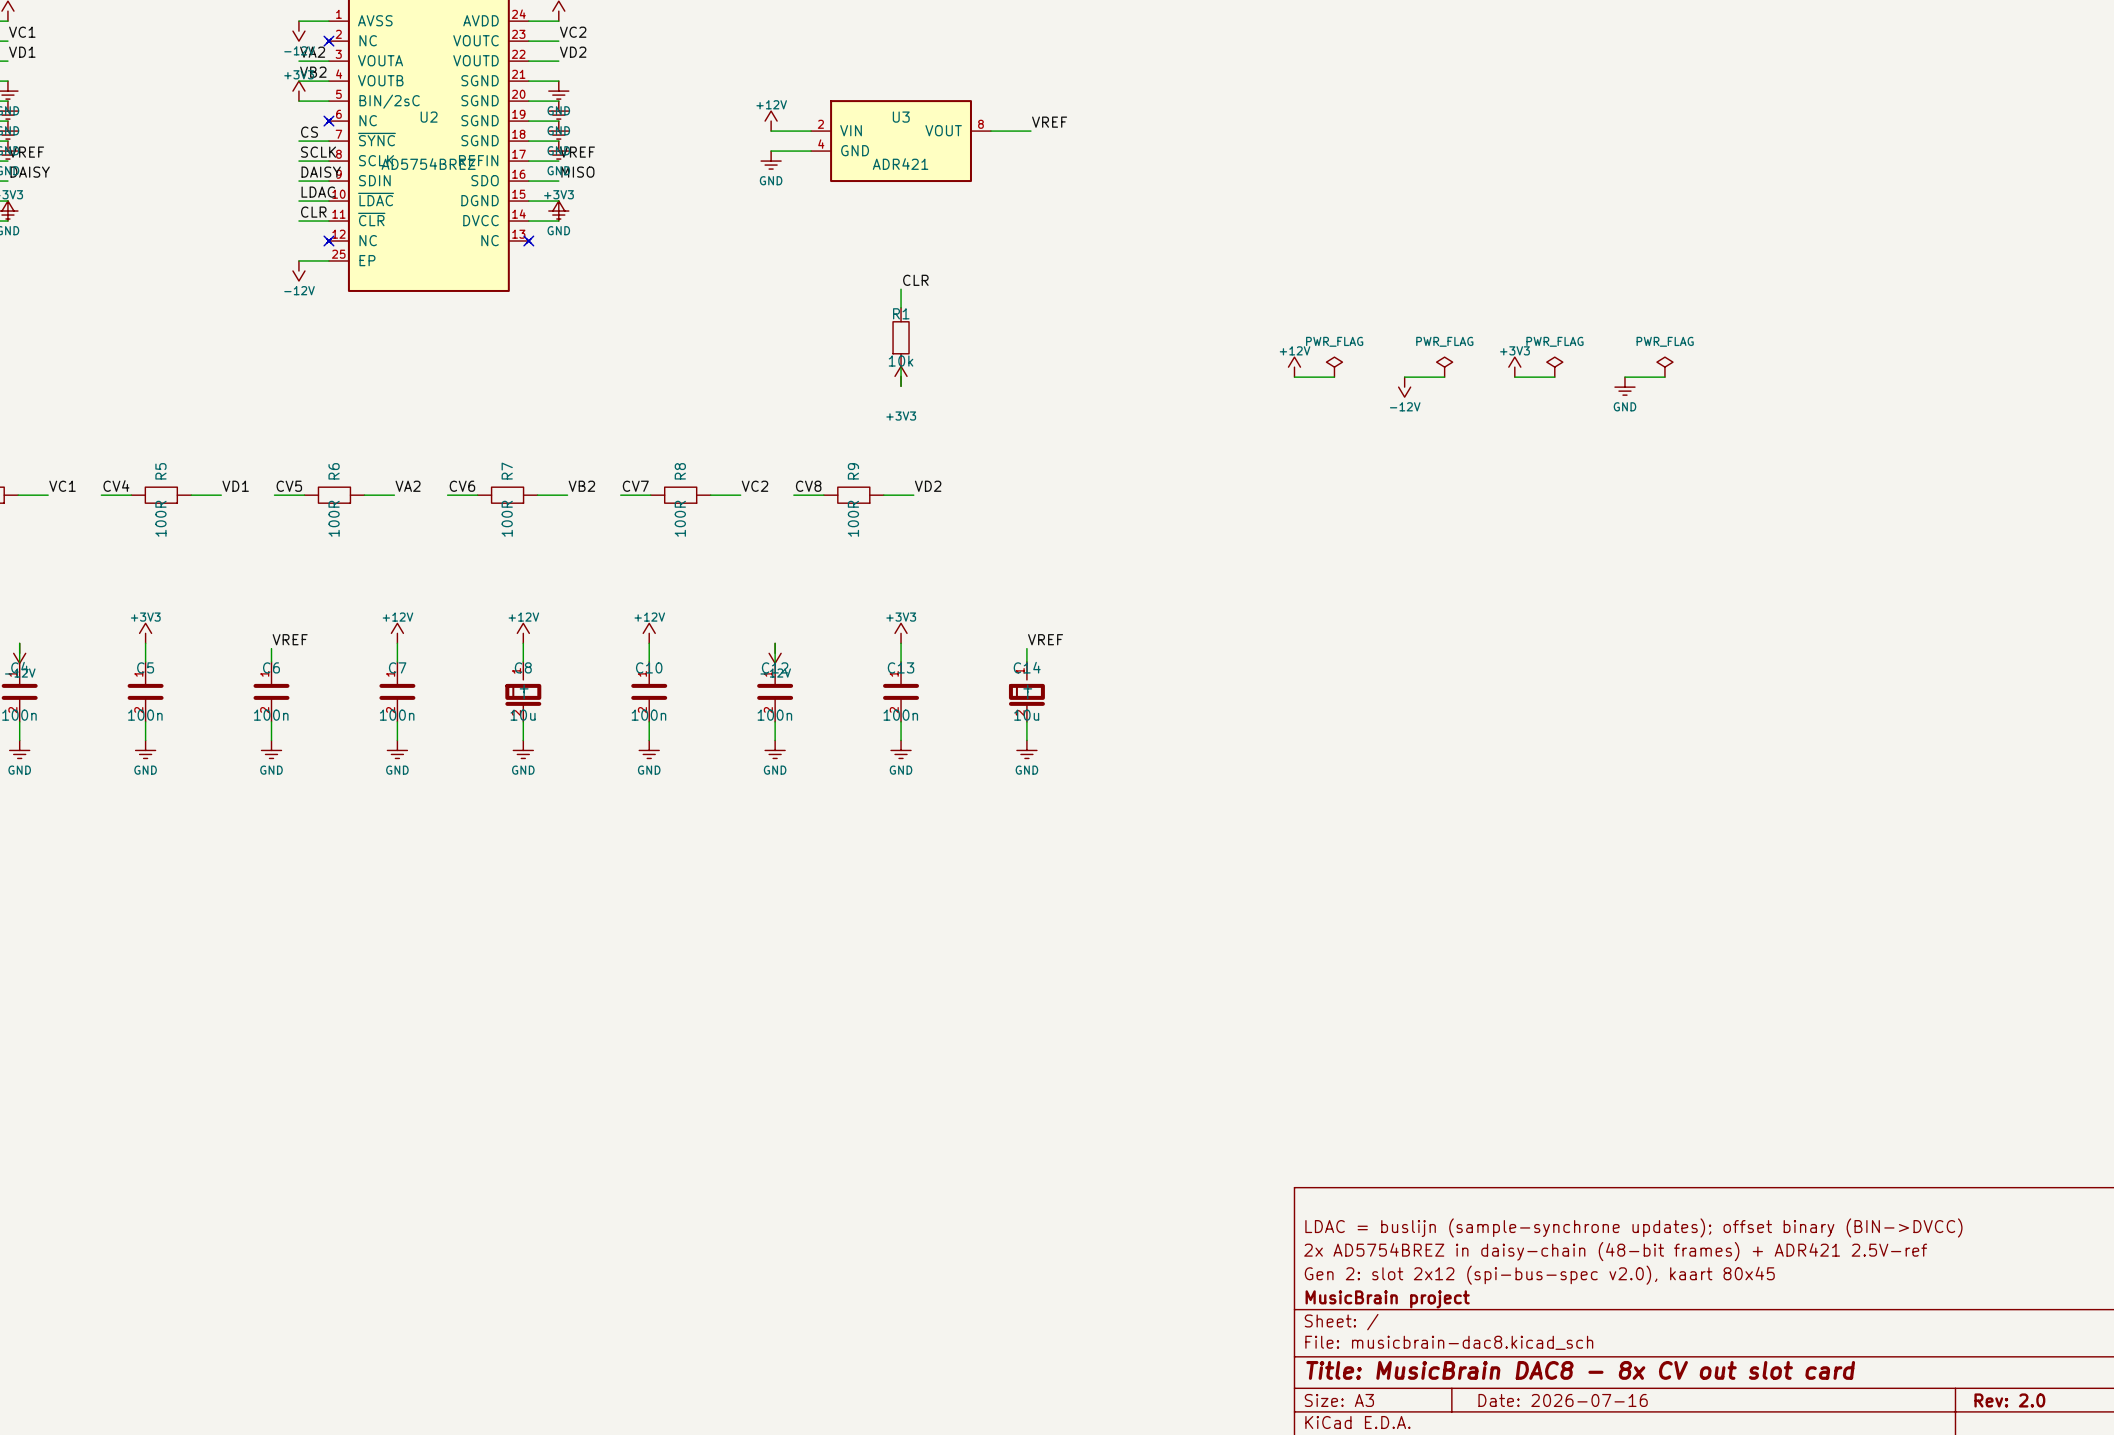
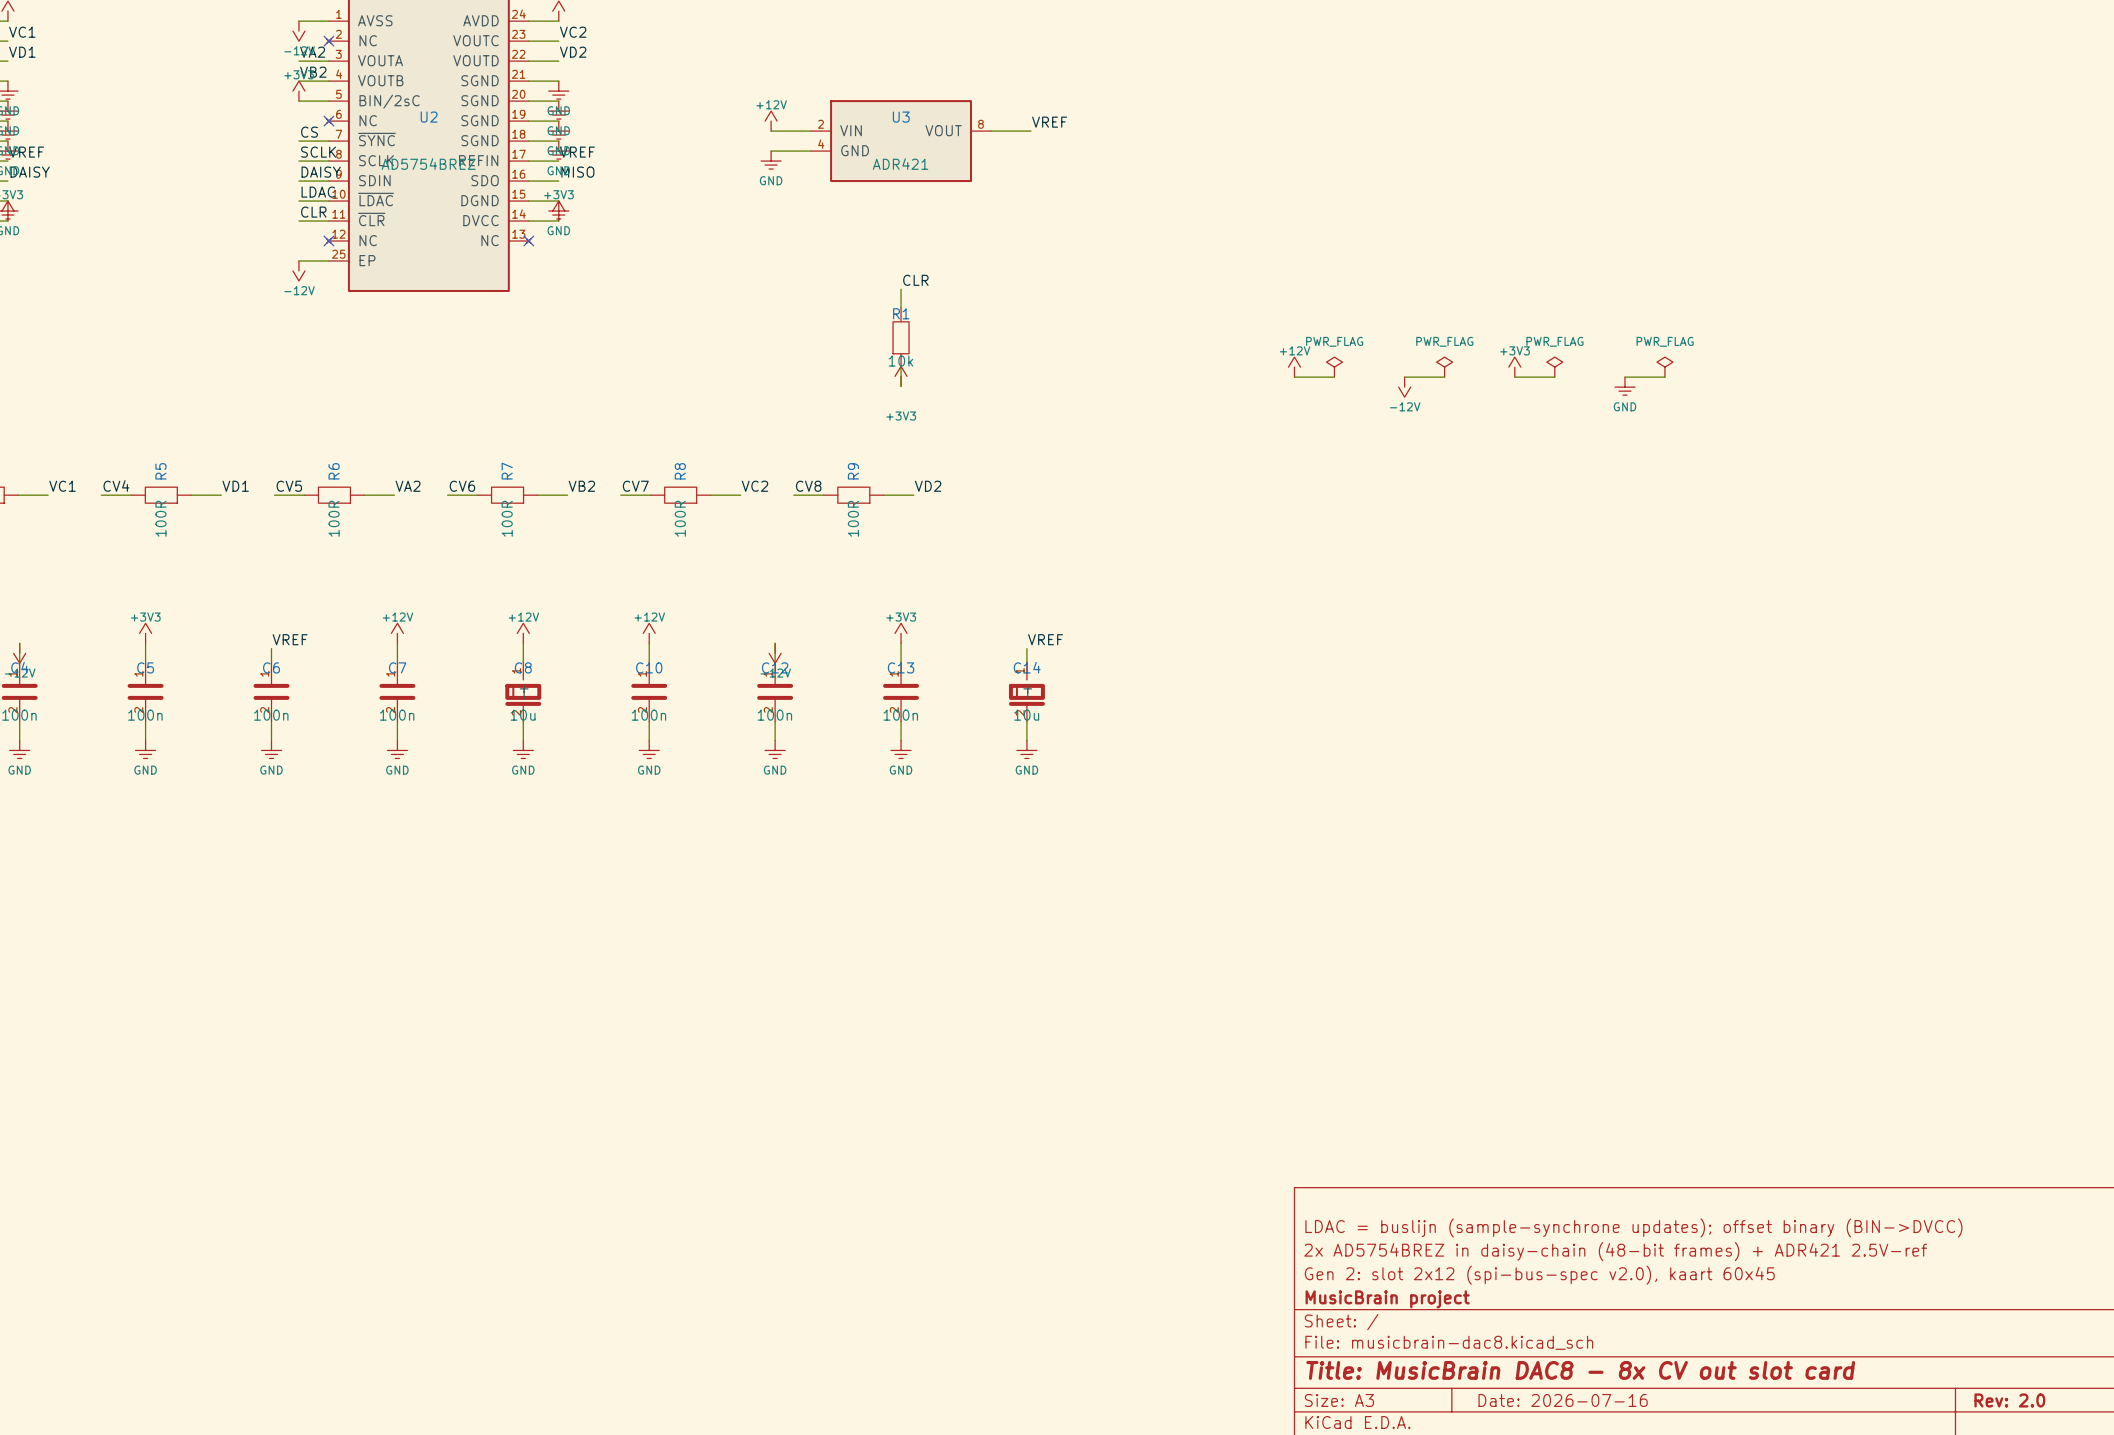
title block: Gen 2: slot 2x12 (spi-bus-spec v2.0), kaart 80x45 (1539, 1275) -> Gen 2: slot 2x12 (spi-bus-spec v2.0), kaart 60x45 (1539, 1275)

